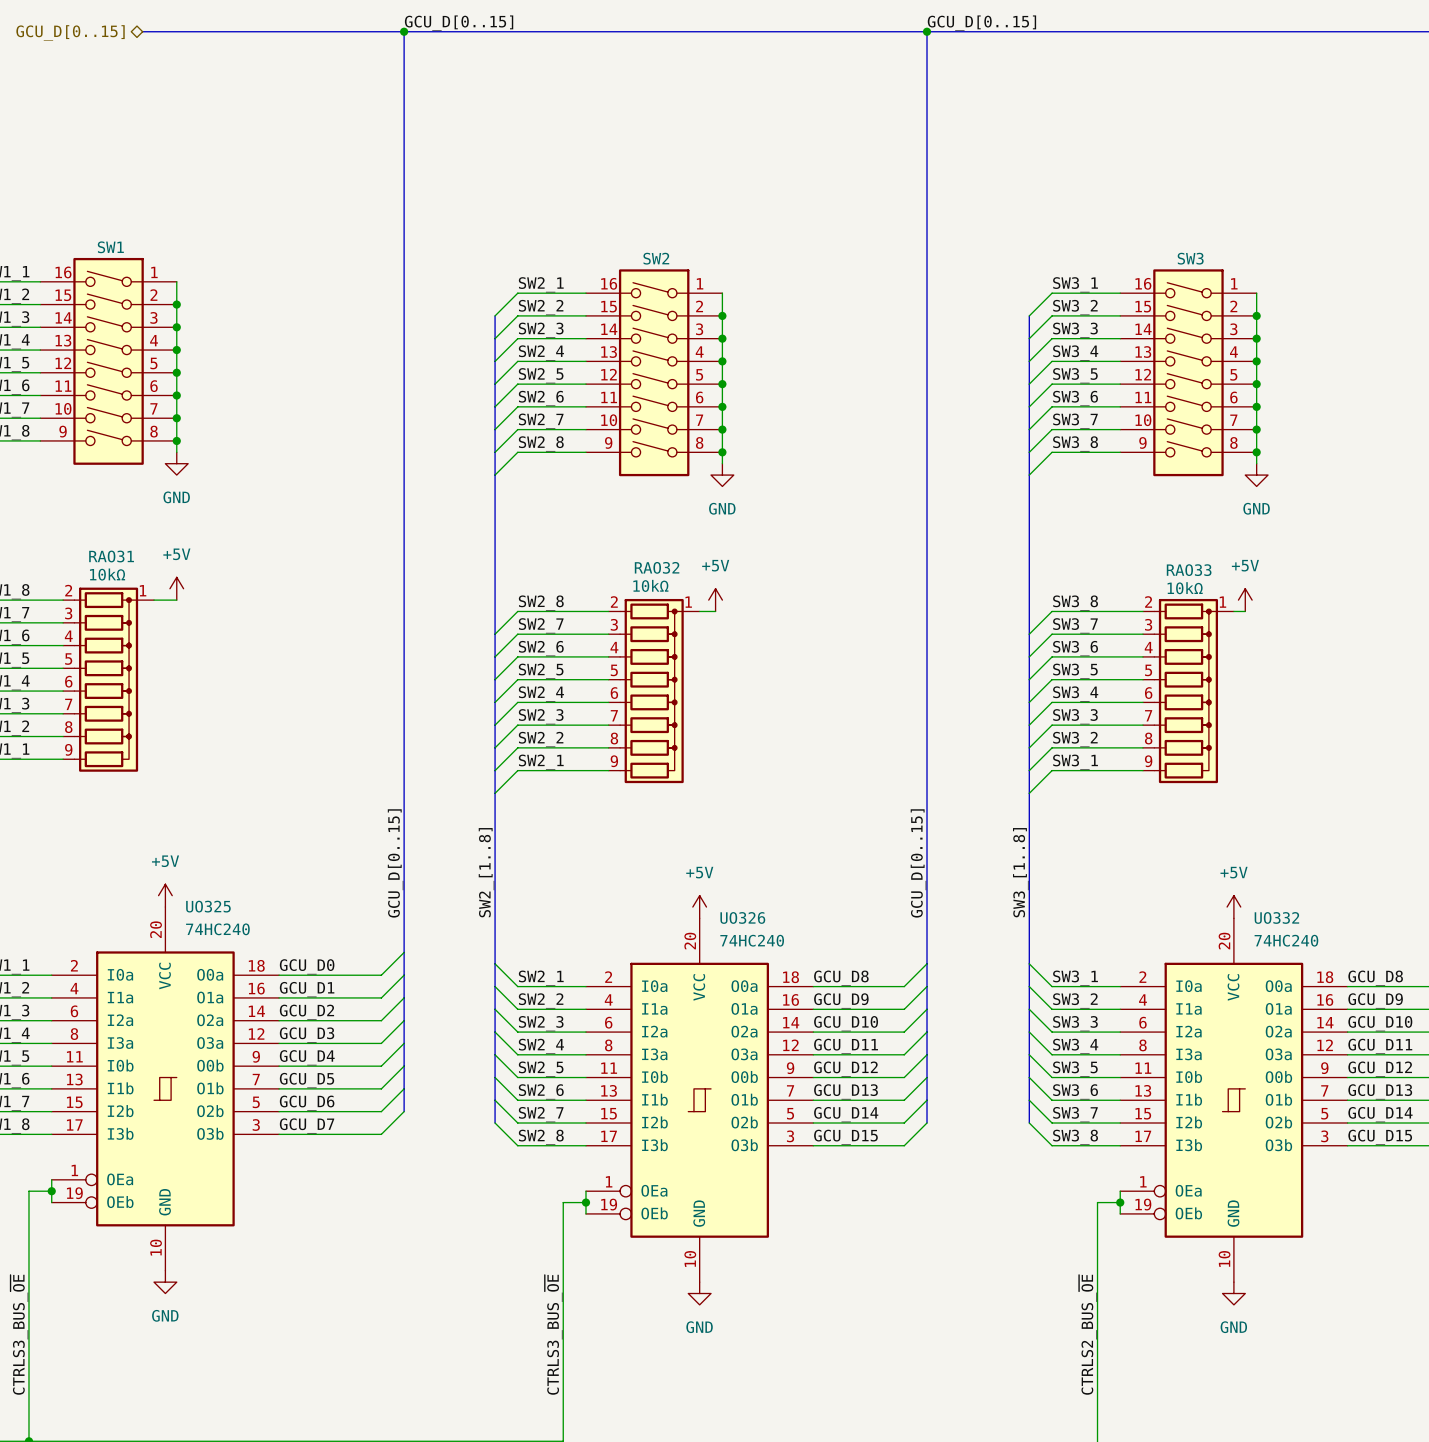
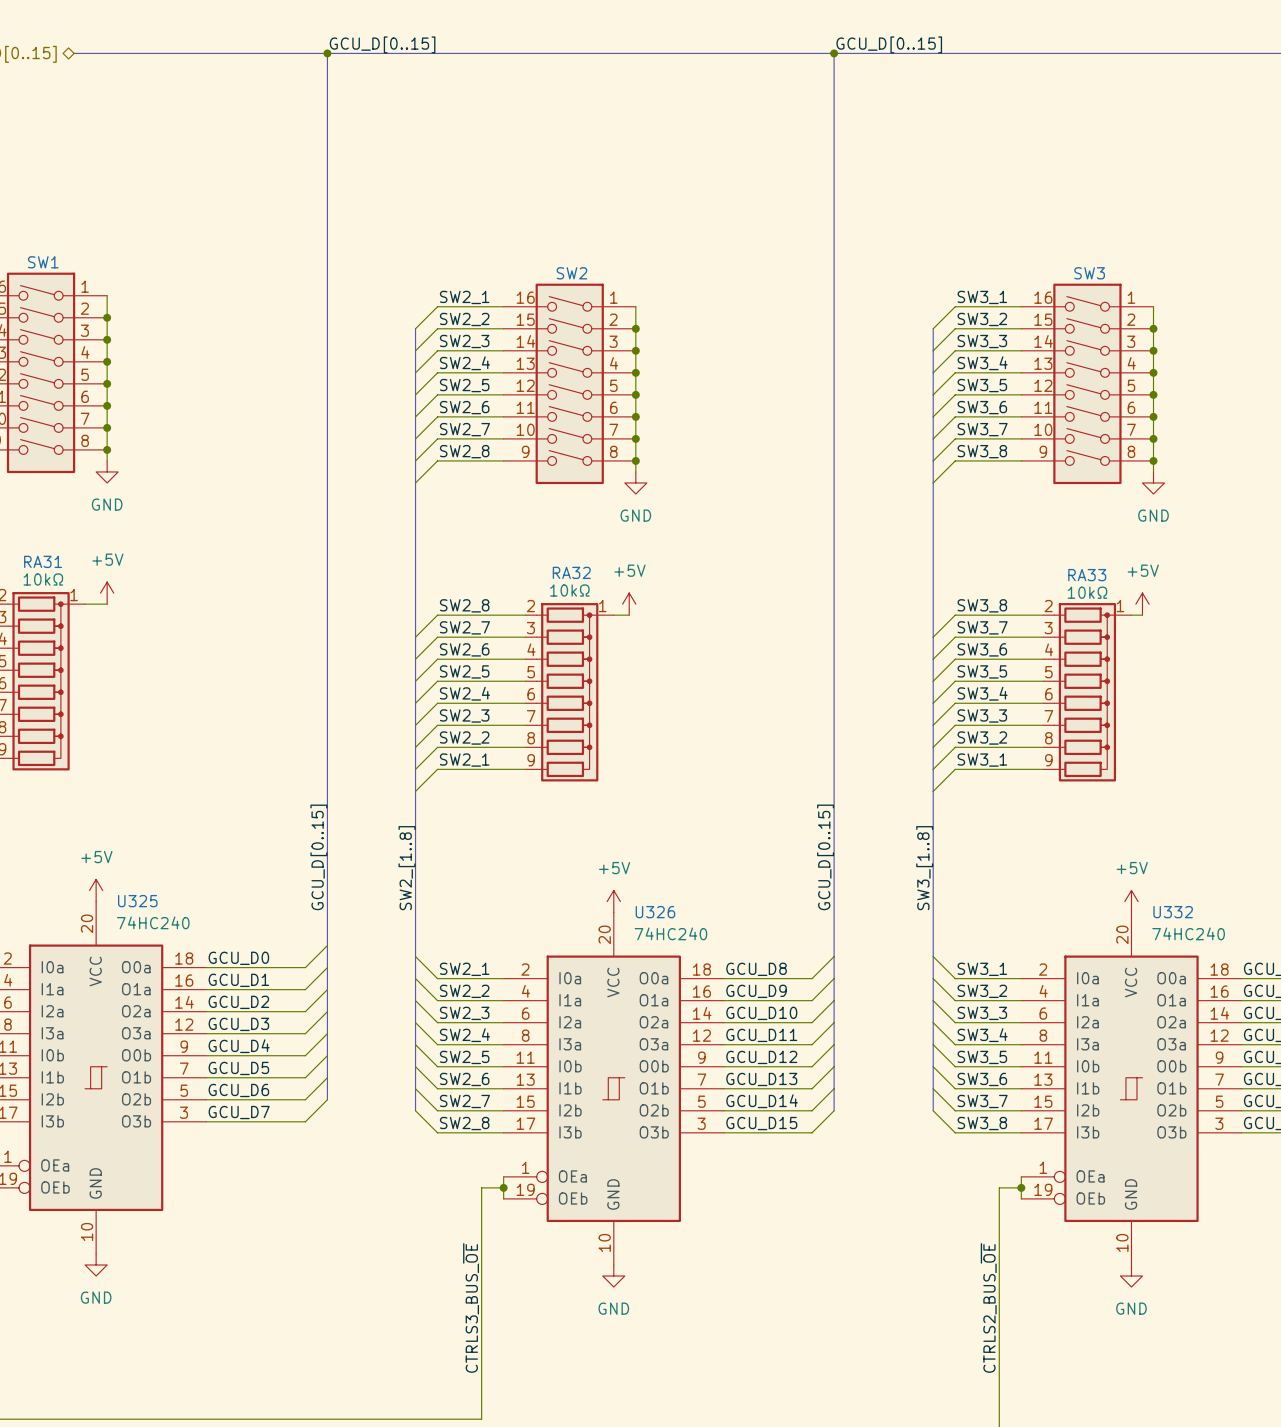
RAO31 name: RAO31 (111, 556) -> RA31 (43, 561)
RAO32 name: RAO32 (657, 567) -> RA32 (571, 572)
RAO33 name: RAO33 (1189, 570) -> RA33 (1087, 575)
UO325 name: UO325 (208, 906) -> U325 (137, 901)
UO326 name: UO326 (742, 917) -> U326 (655, 912)
UO332 name: UO332 (1276, 917) -> U332 (1173, 912)

